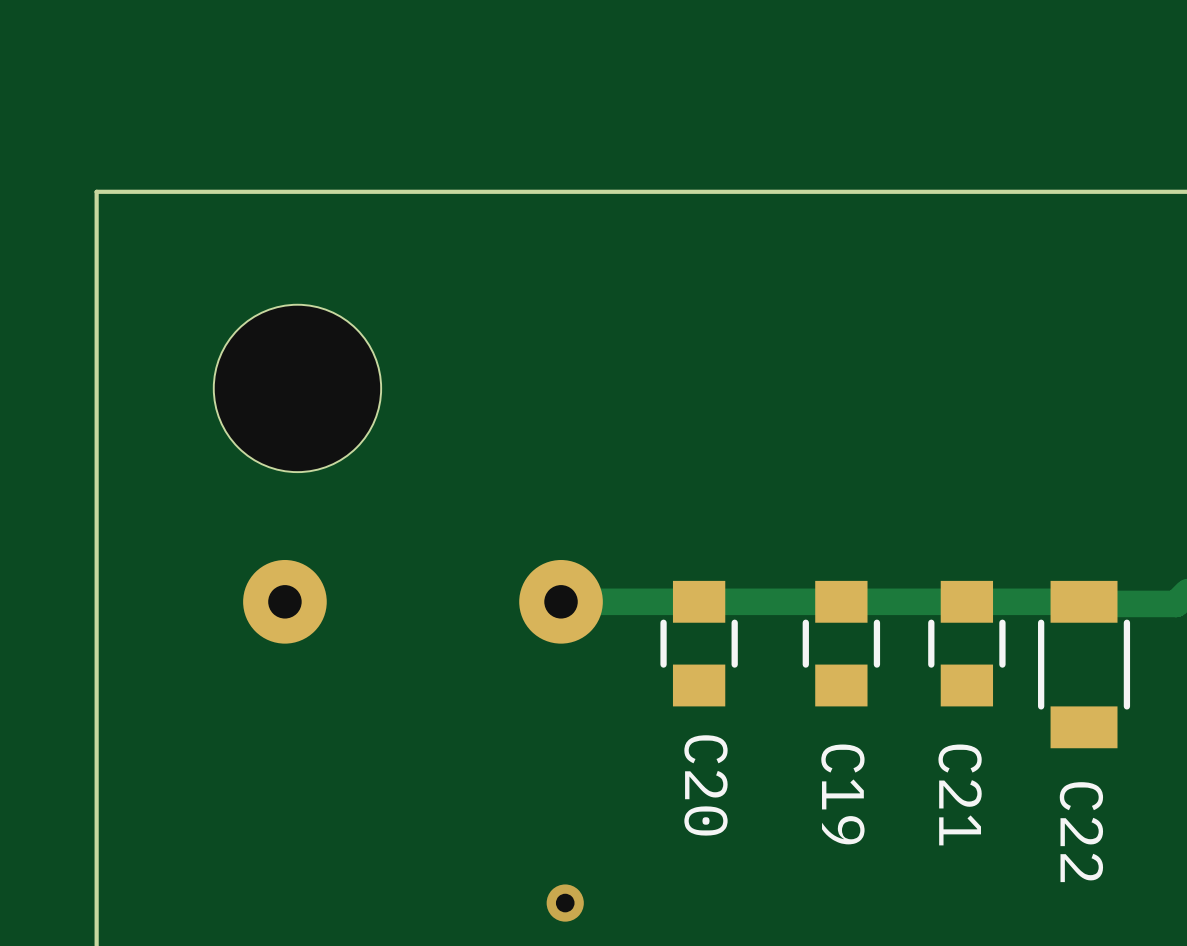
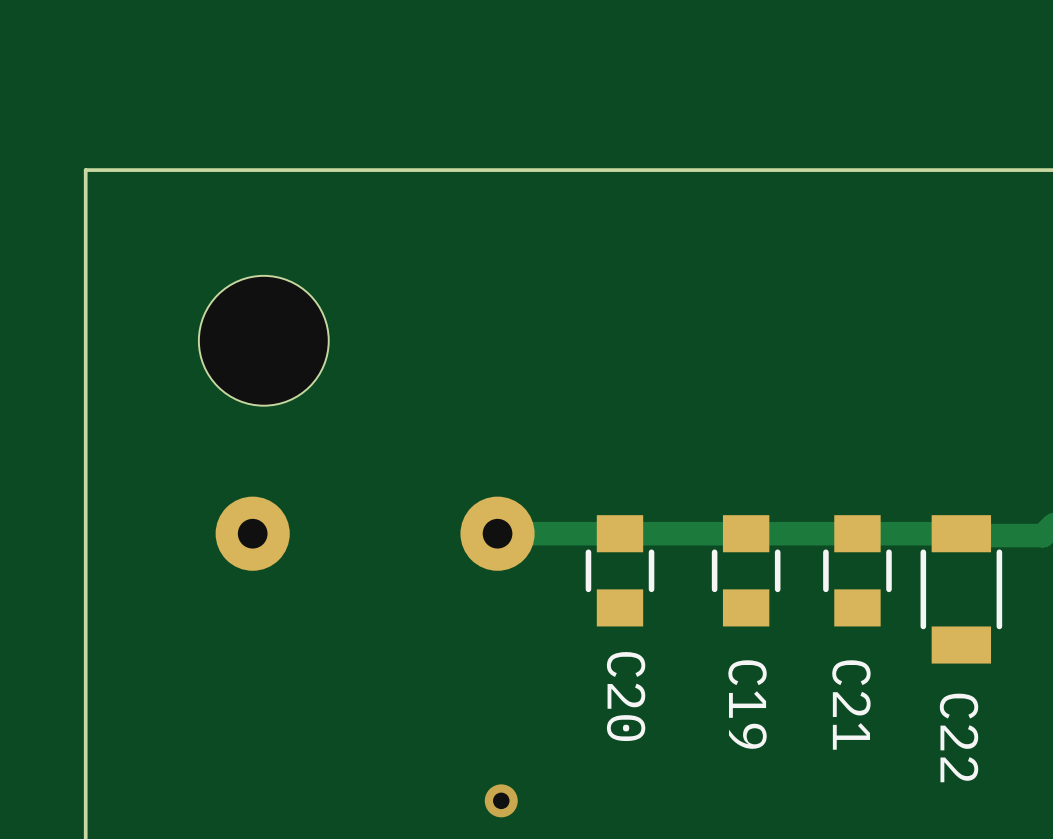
part footprint: [213, 304, 382, 473] -> [198, 275, 329, 406]

